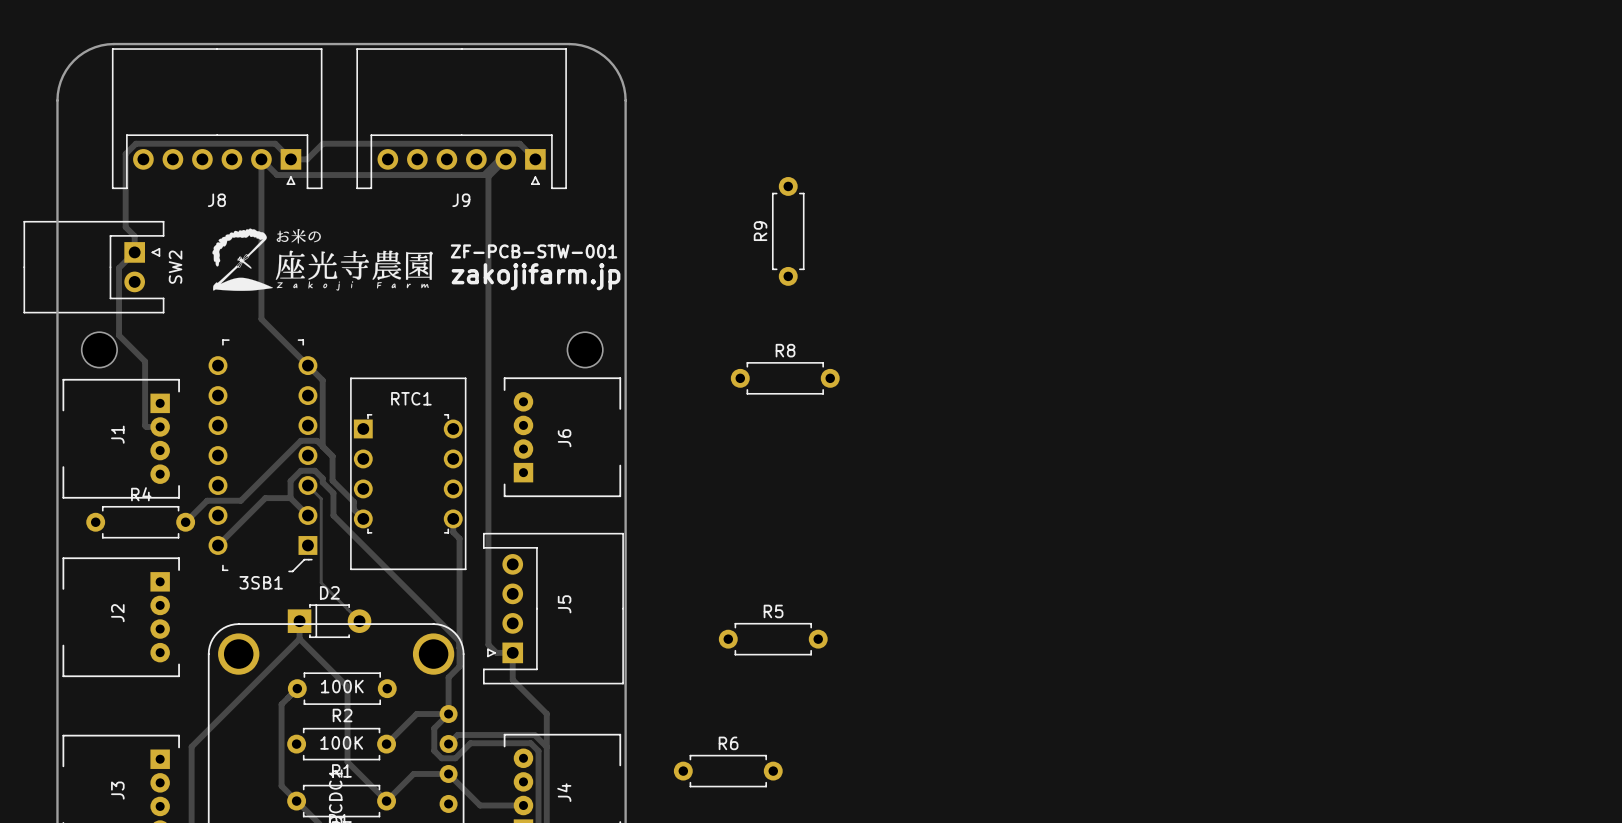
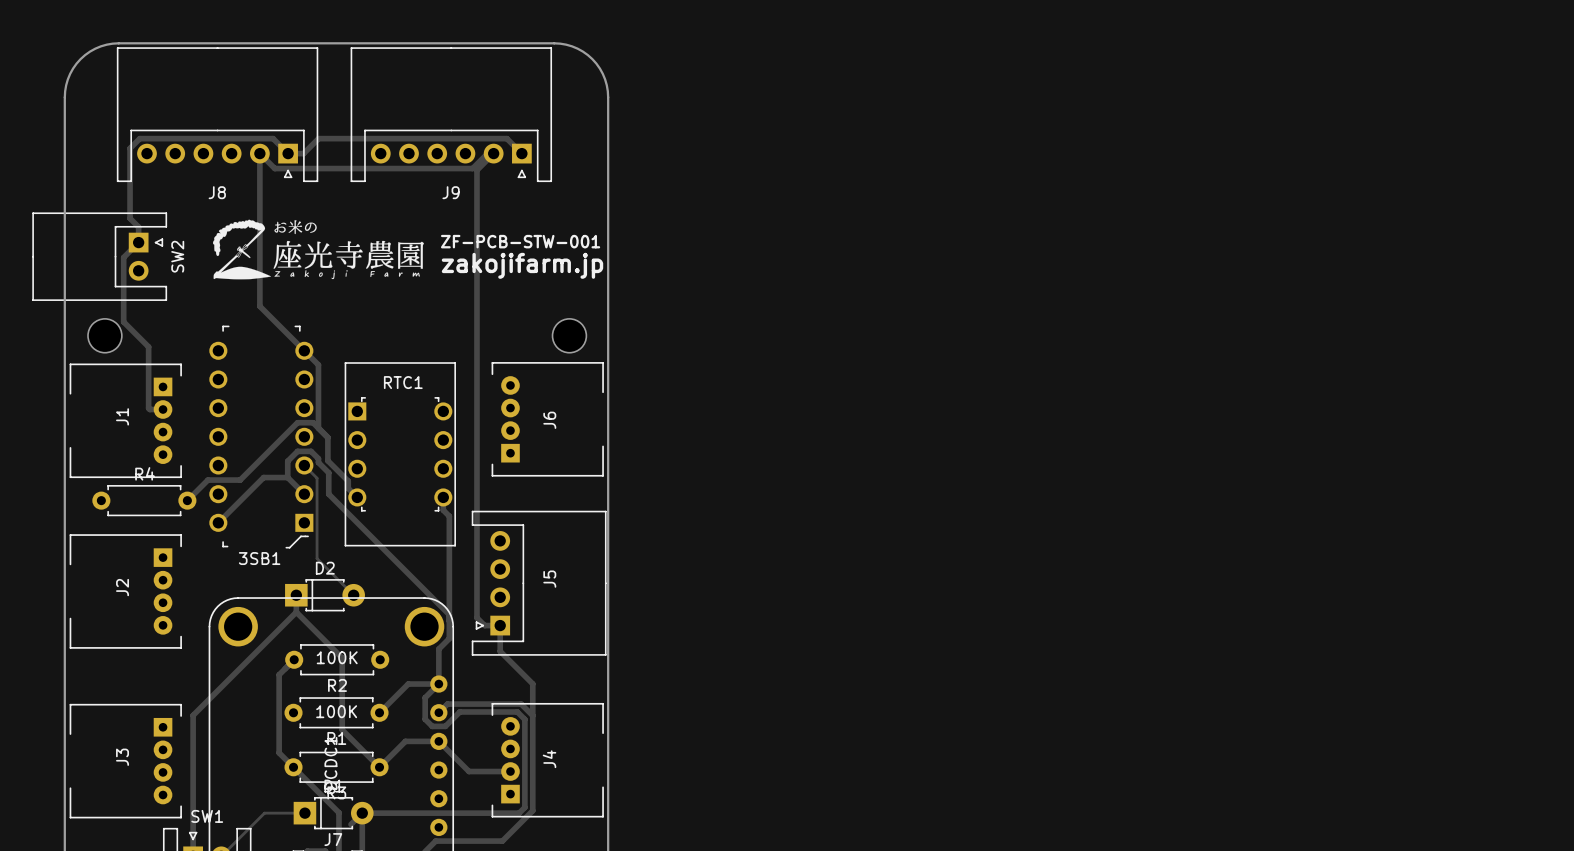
R9: (788, 231) -> none
R8: (785, 378) -> none
R5: (773, 639) -> none
R6: (728, 771) -> none

